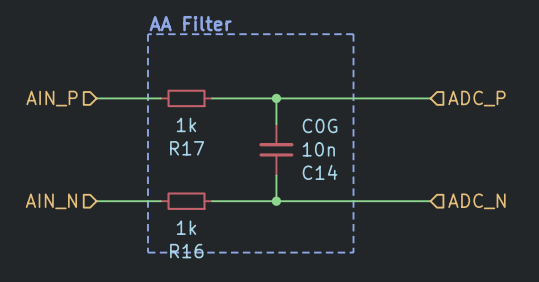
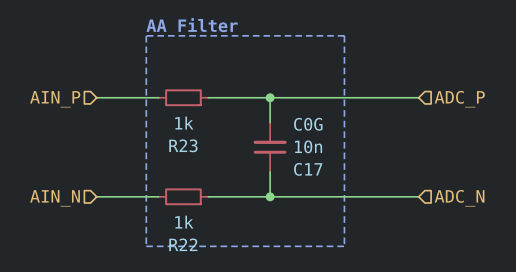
R17 name: R17 (187, 148) -> R23 (183, 145)
C14 name: C14 (320, 172) -> C17 (308, 169)
R16 name: R16 (186, 251) -> R22 (183, 244)

